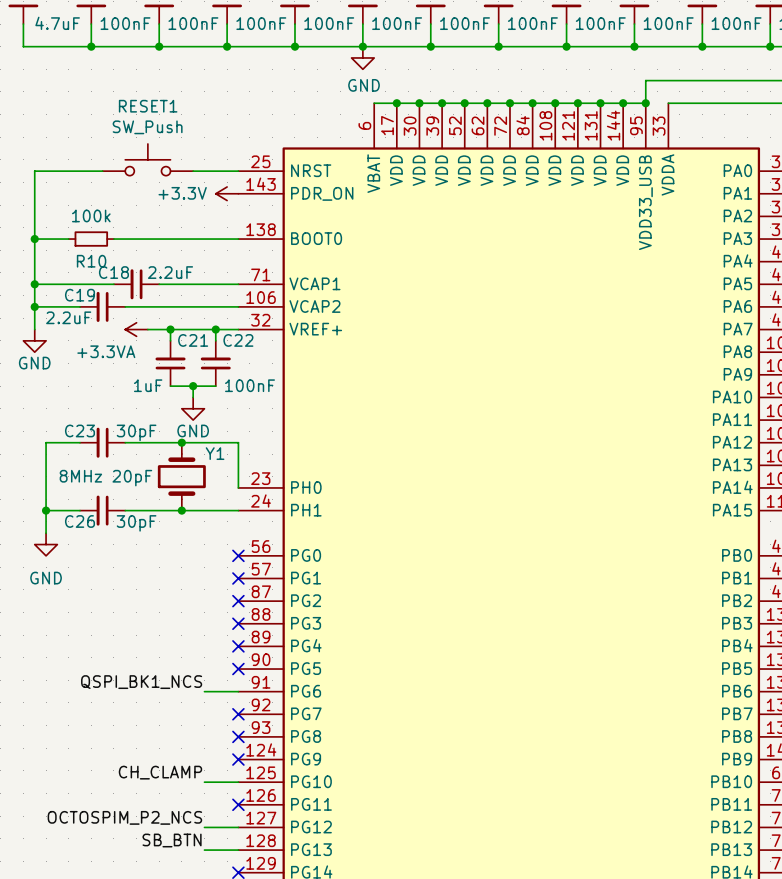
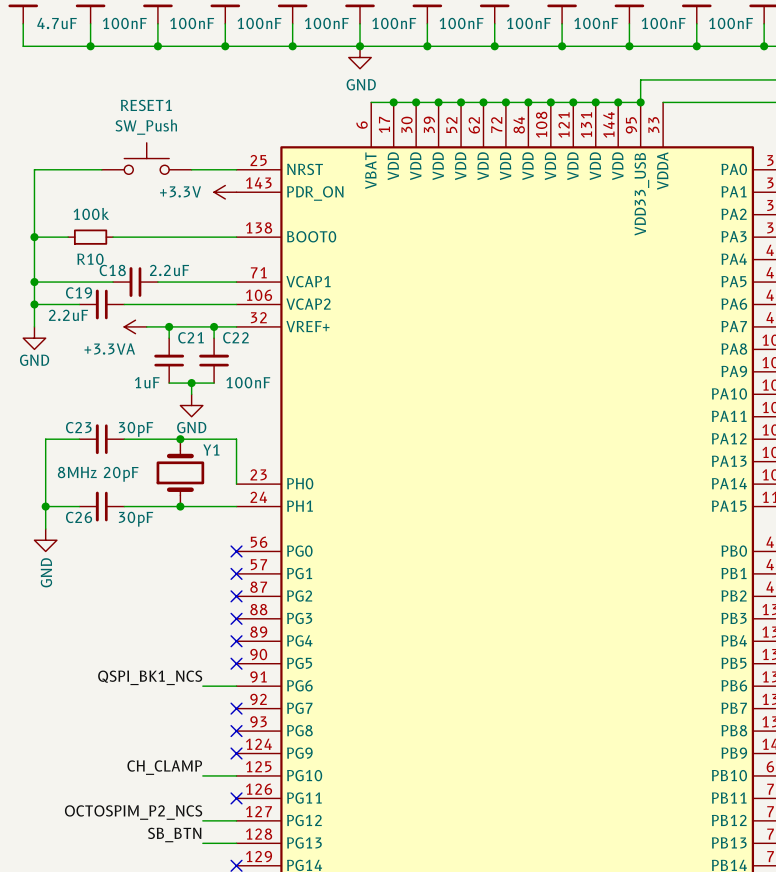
power symbol text rotation: 0° (46, 578) -> 90° counterclockwise (46, 572)

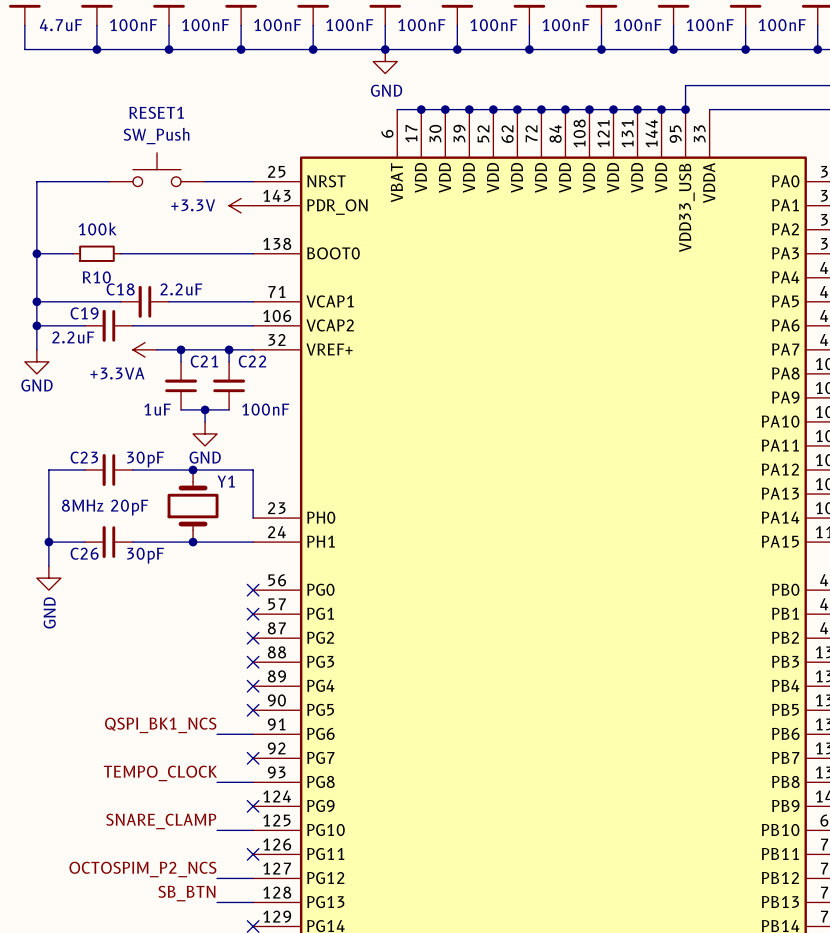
label: none -> TEMPO_CLOCK (160, 773)
wire: none -> (217, 782) (253, 782)
no-connect mark: (236, 731) -> none
label: CH_CLAMP (164, 767) -> SNARE_CLAMP (161, 821)

